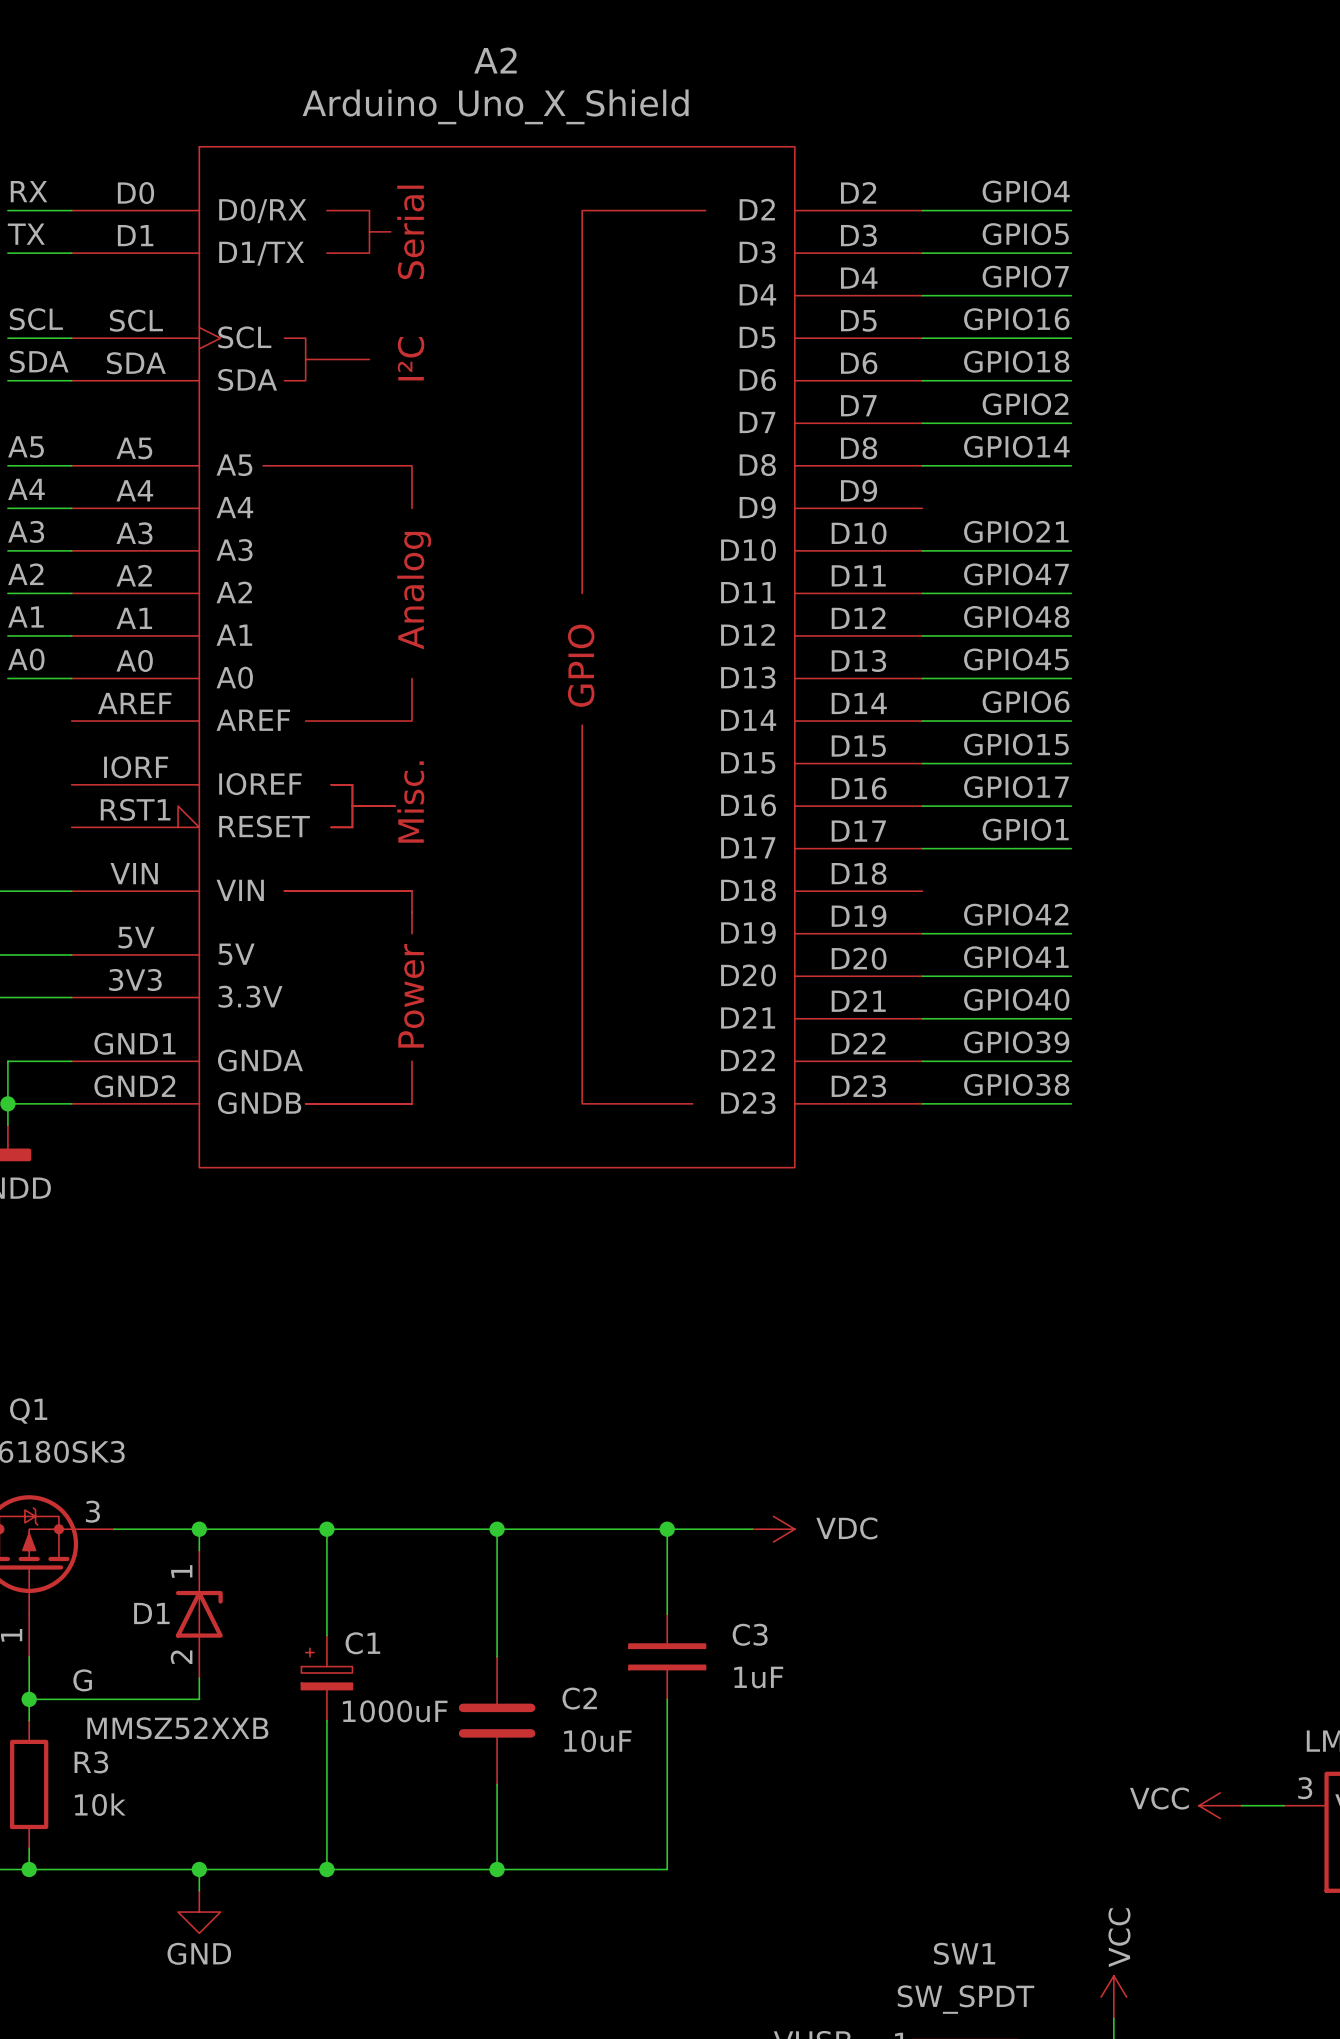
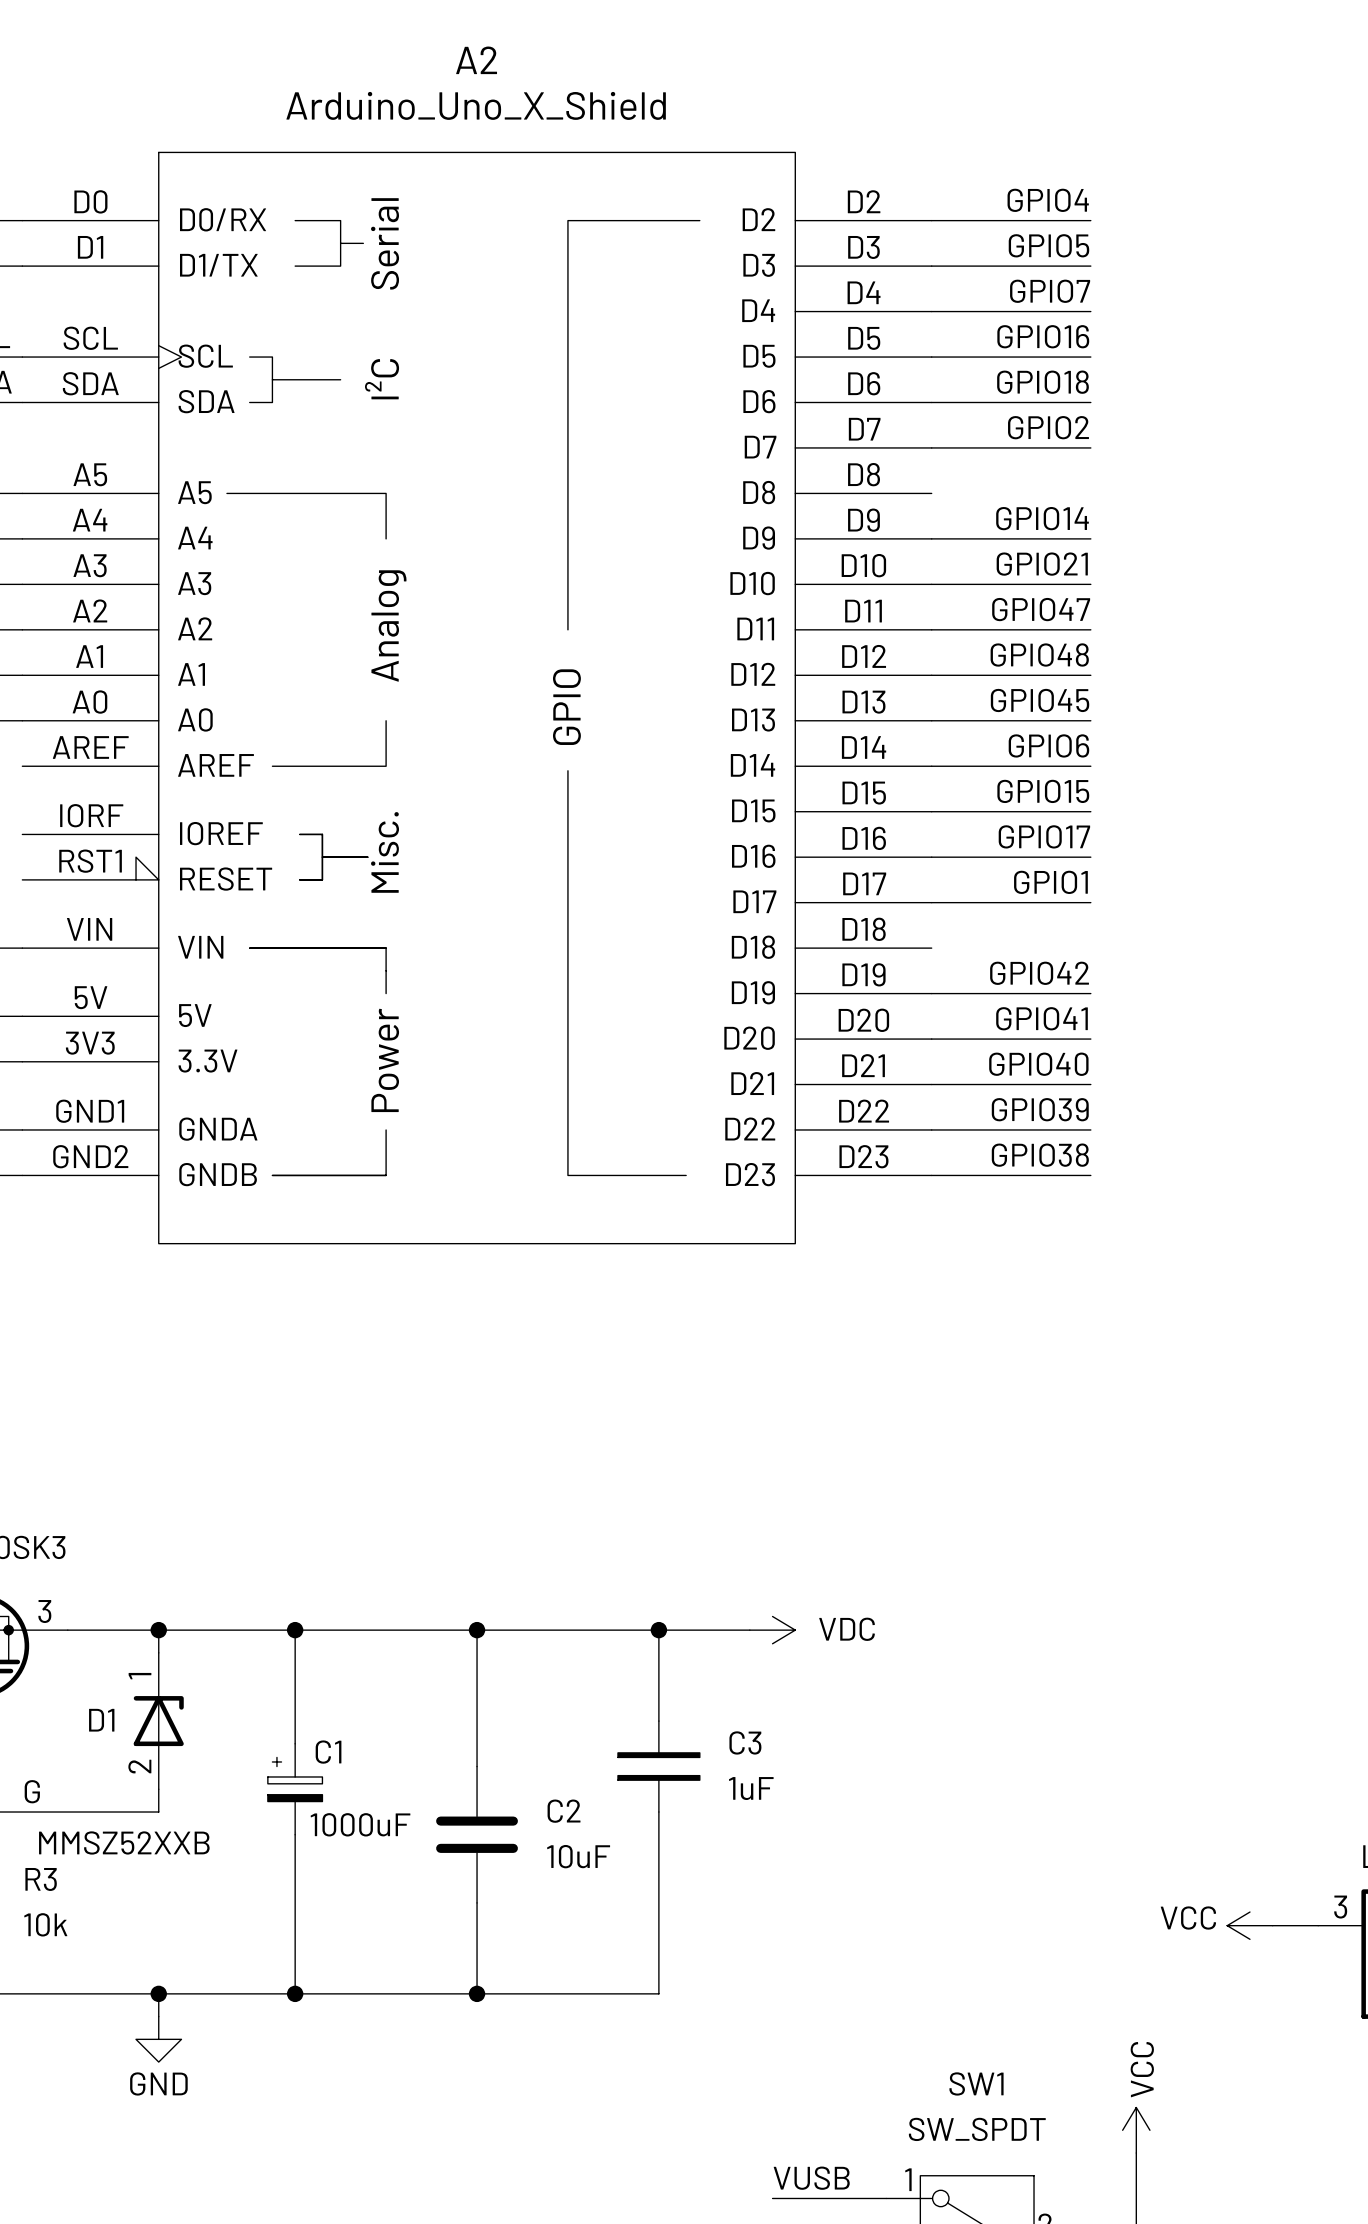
label position: GPIO14 (1016, 446) -> GPIO14 (1042, 518)
wire: (922, 465) (1071, 465) -> (931, 538) (1090, 538)

